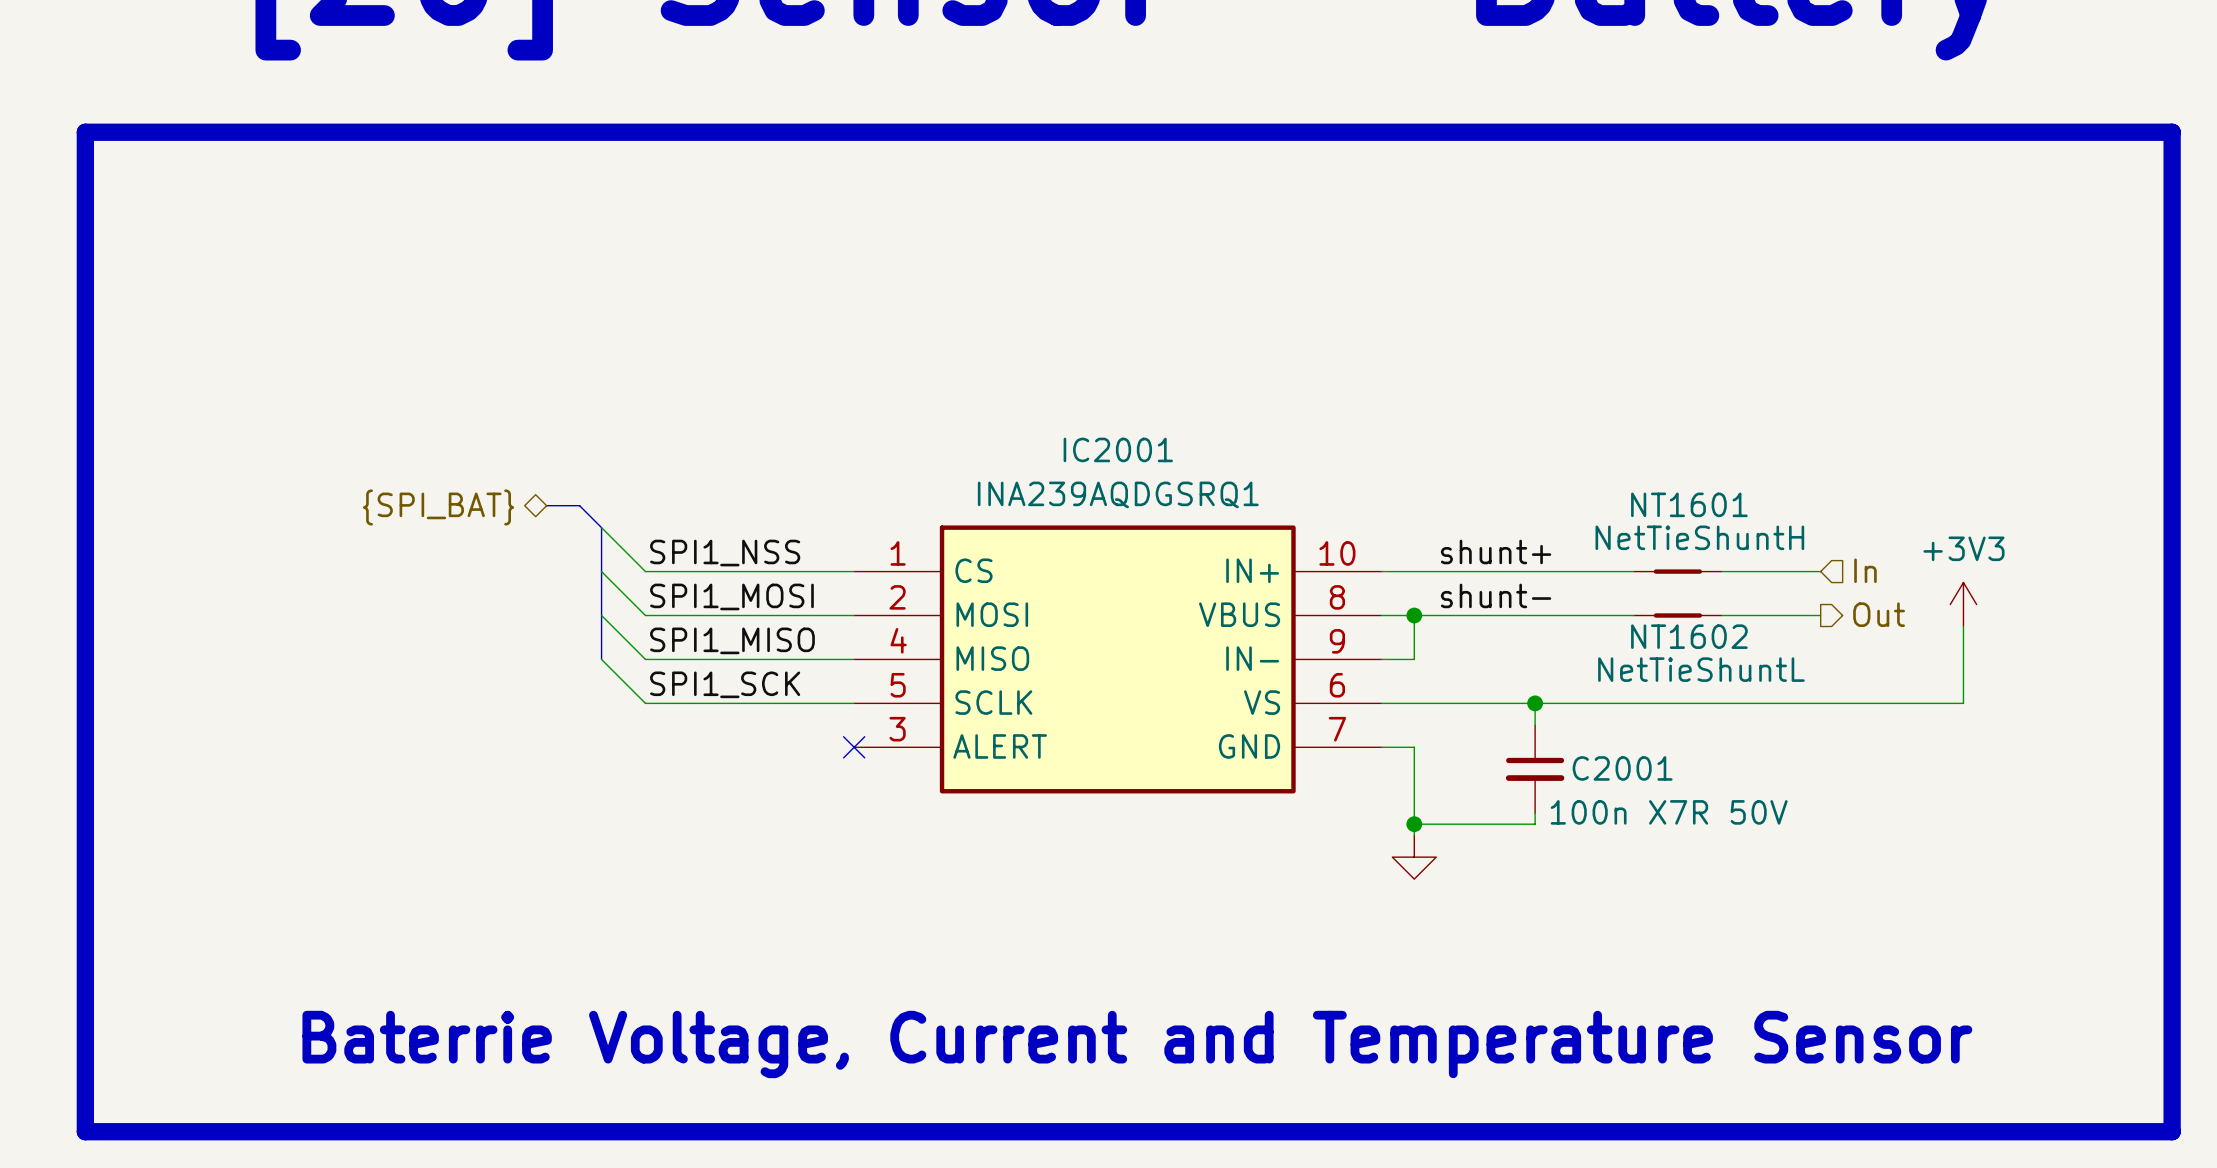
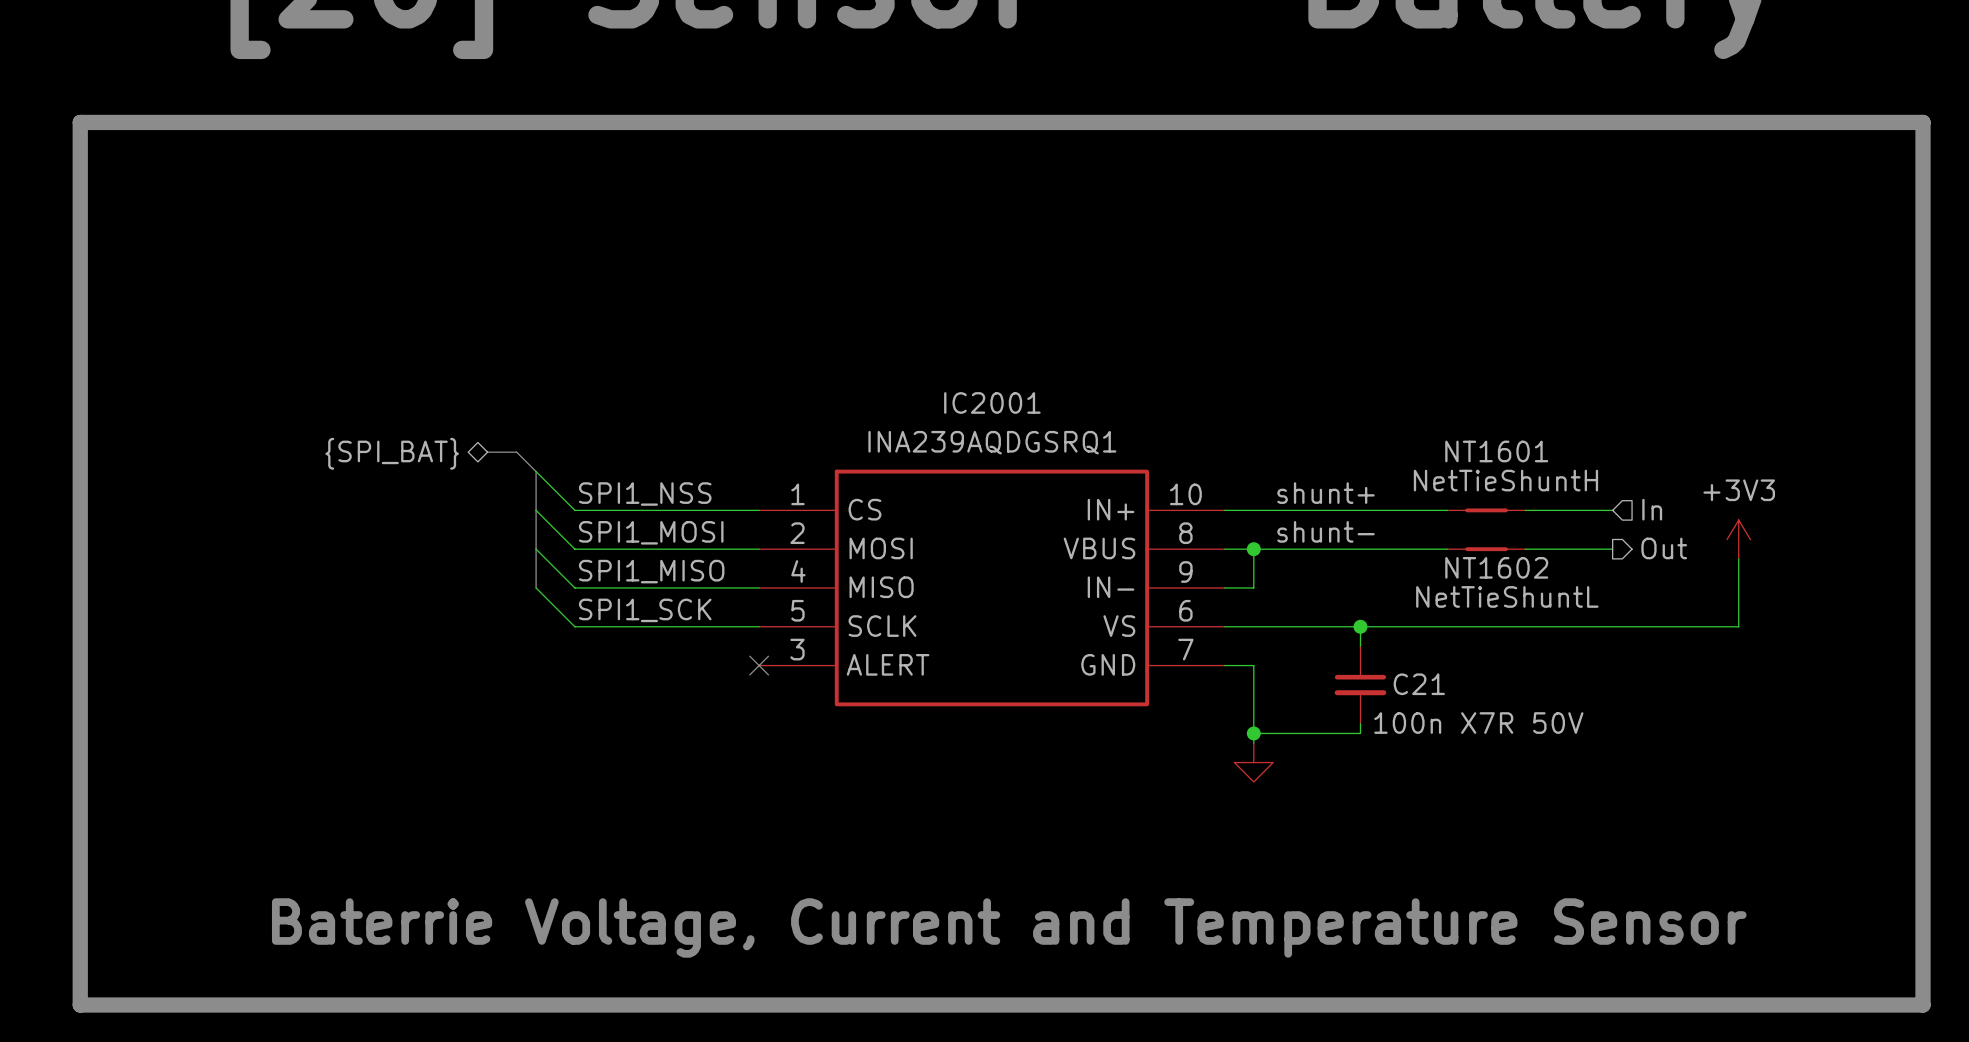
C2001 name: C2001 (1622, 768) -> C21 (1419, 684)

